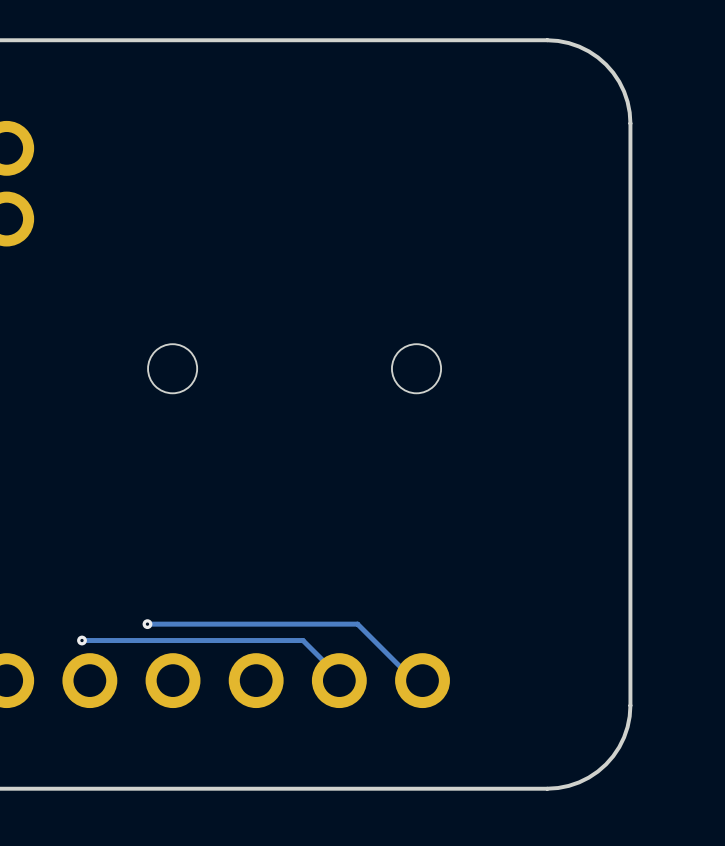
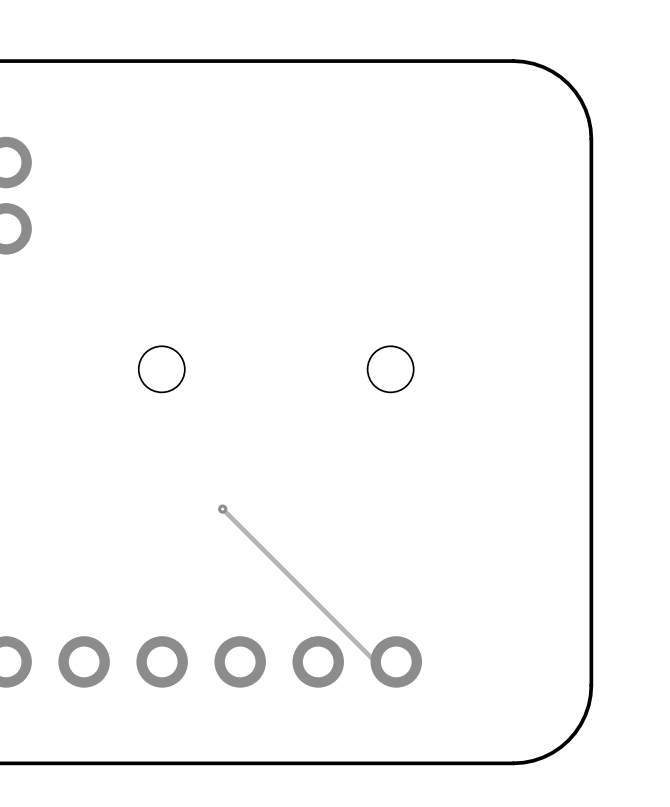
track: none -> (222, 509) (373, 660)
via: none -> (222, 509)
track: (147, 624) (357, 624) (403, 670) -> none
via: (147, 624) -> none
track: (82, 640) (303, 640) (322, 659) -> none
via: (82, 640) -> none

